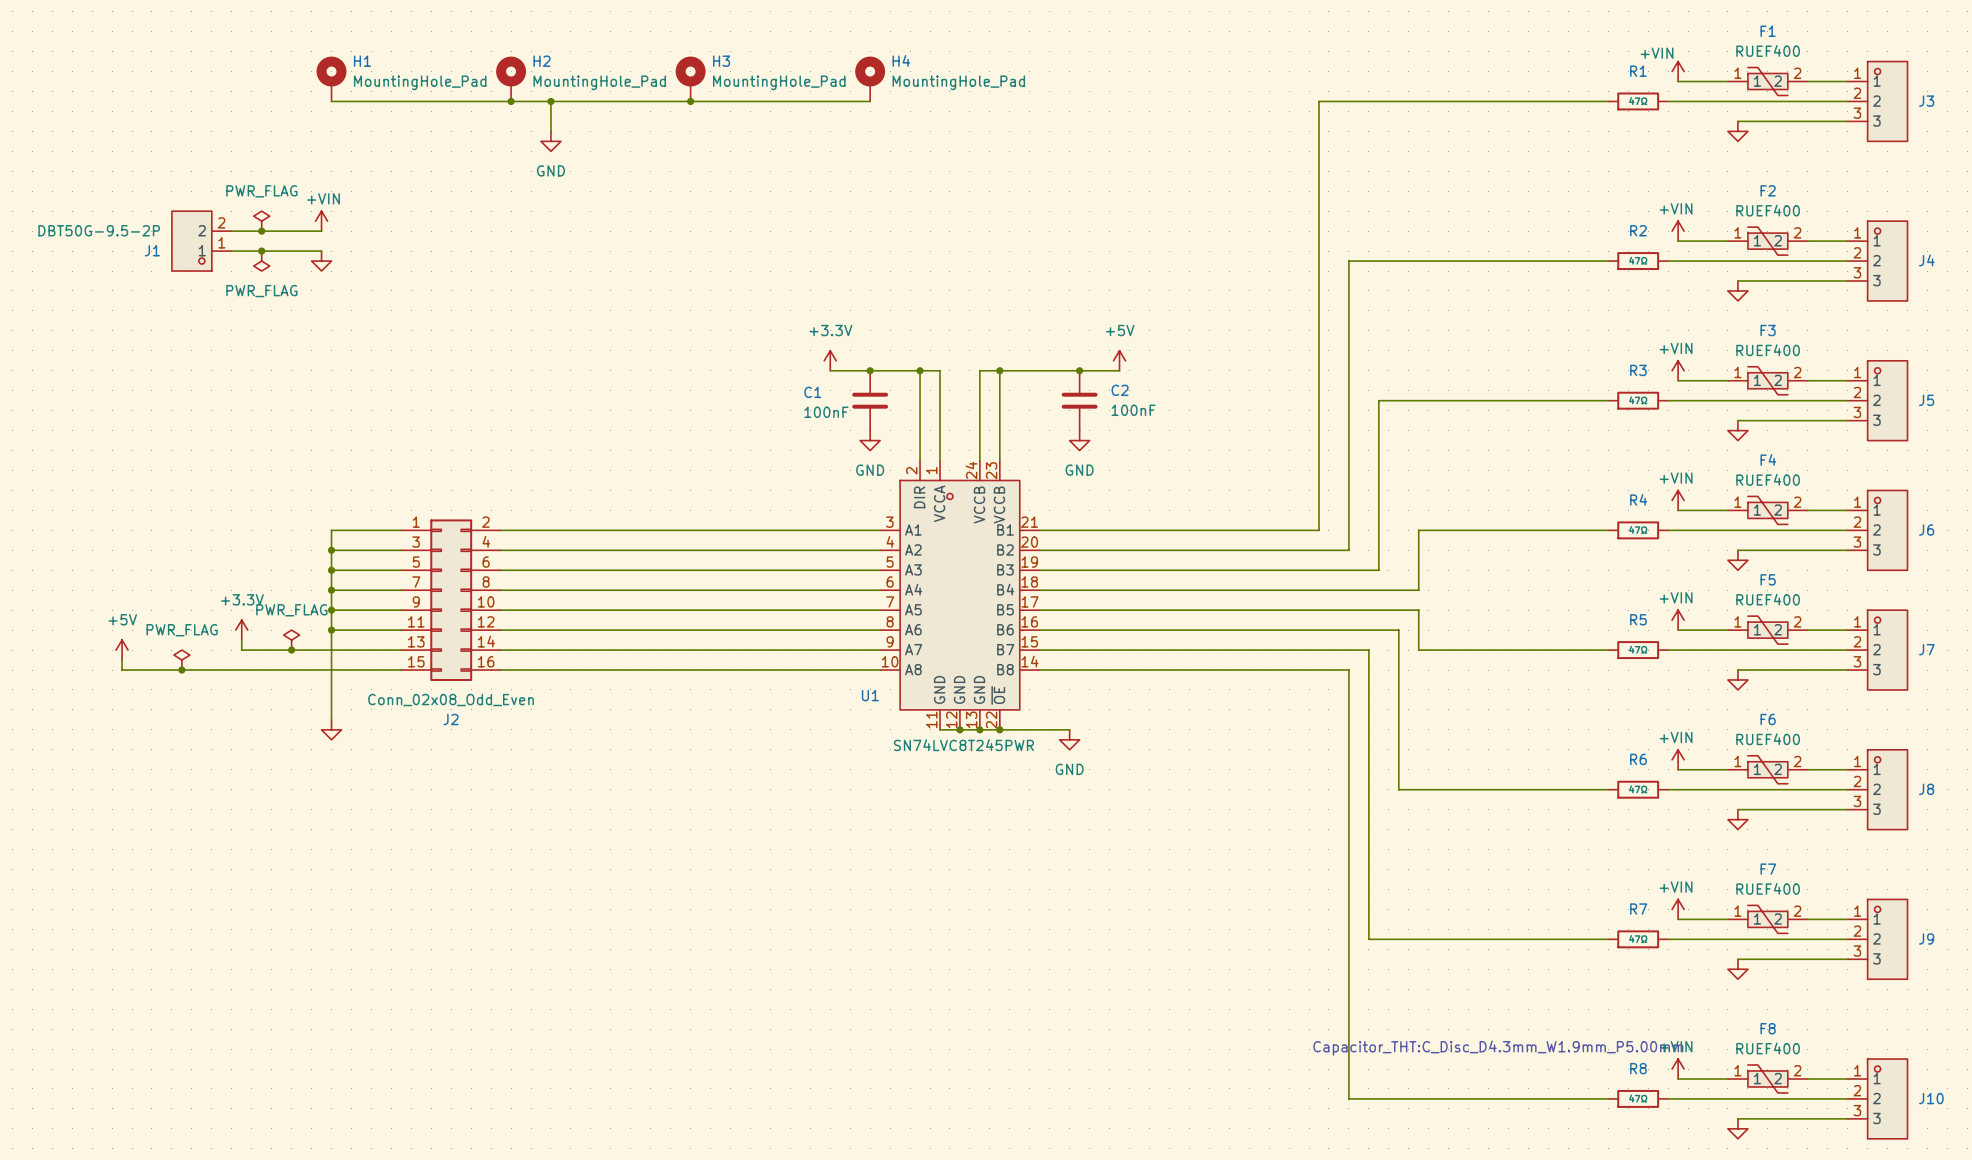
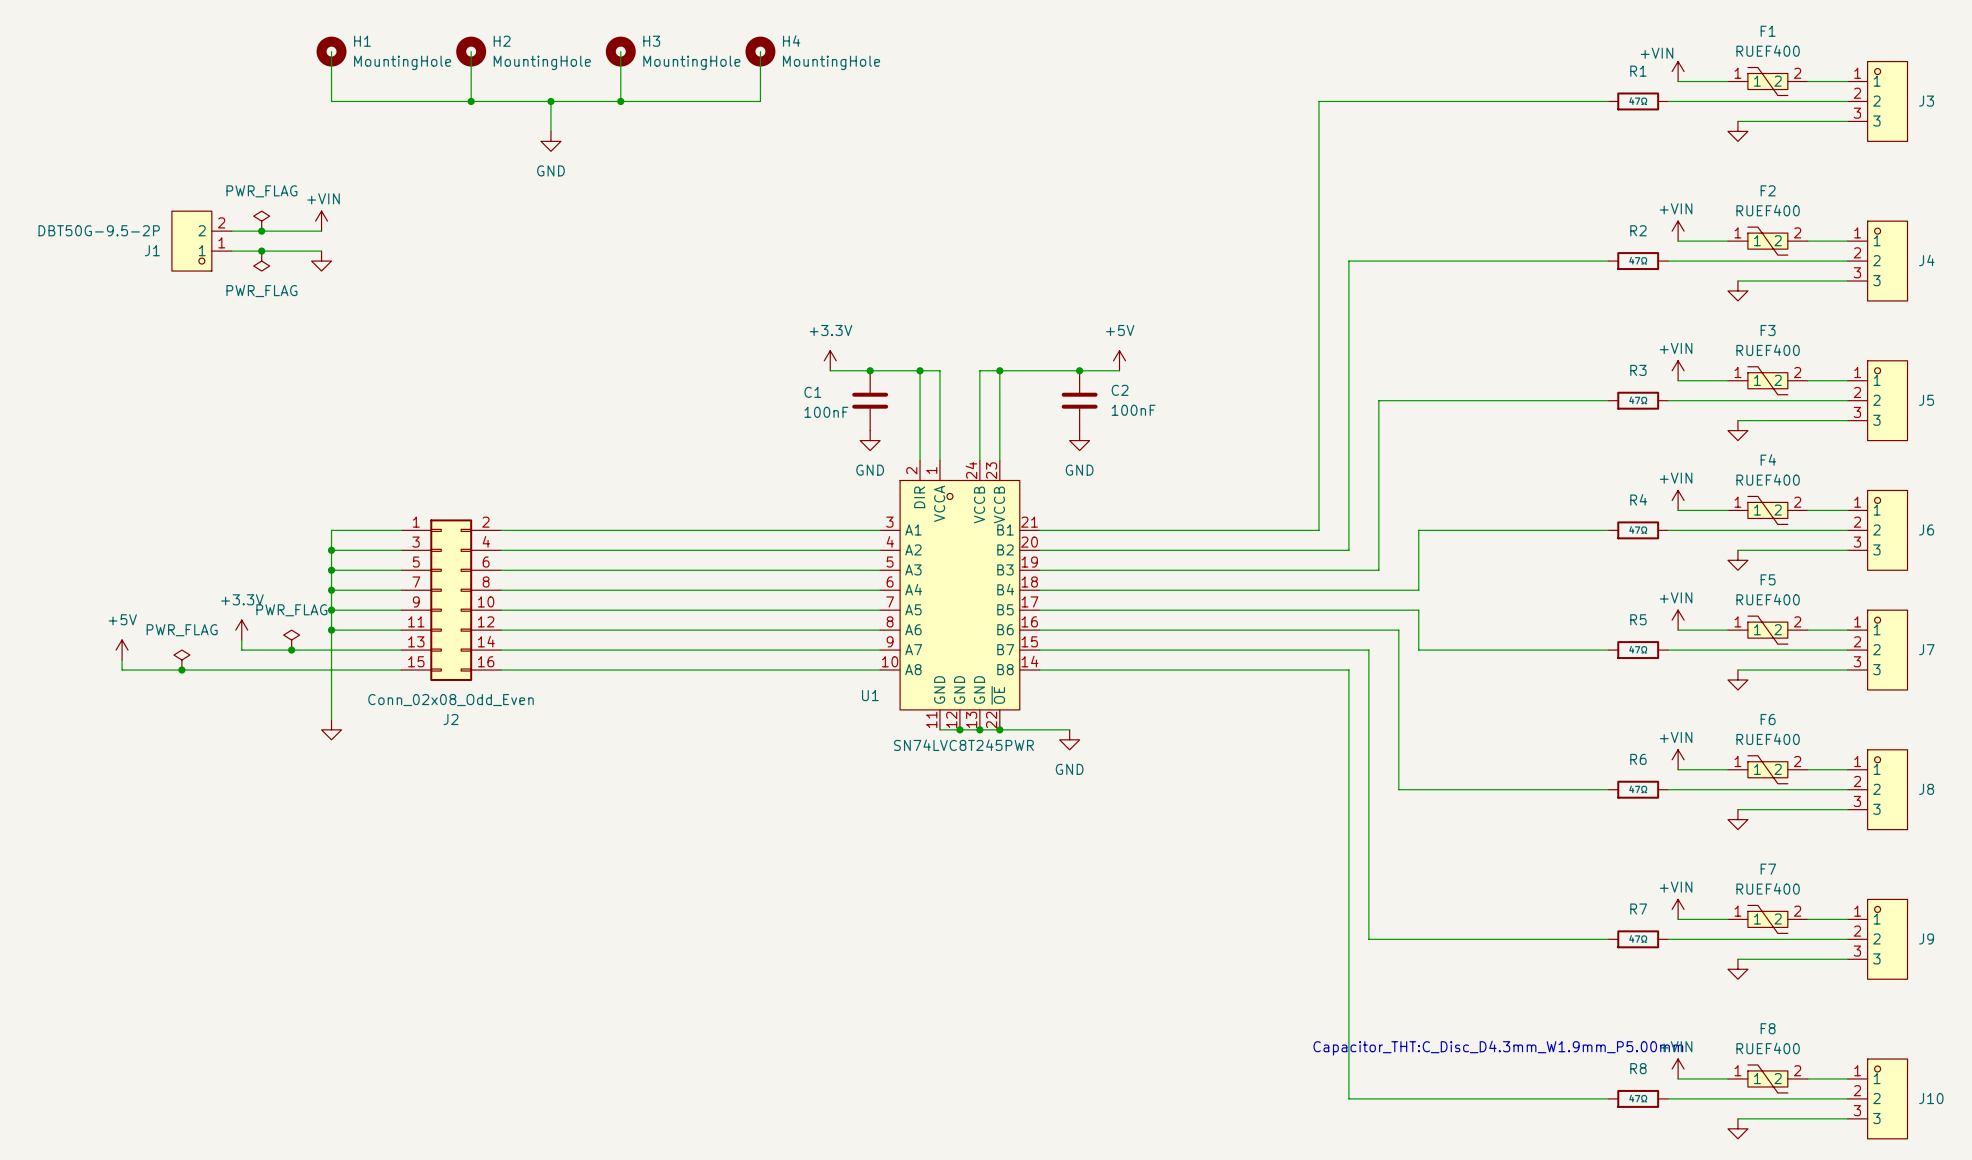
wire: none -> (471, 51) (471, 101)
wire: none -> (620, 51) (620, 101)
H1 symbol: [316, 56, 347, 102] -> [316, 36, 347, 67]
H2 symbol: [496, 56, 527, 102] -> [456, 36, 487, 67]
H3 symbol: [675, 56, 706, 102] -> [605, 36, 636, 67]
H4 symbol: [855, 56, 886, 102] -> [745, 36, 776, 67]
H1 value: MountingHole_Pad (420, 82) -> MountingHole (402, 62)
H2 value: MountingHole_Pad (599, 82) -> MountingHole (542, 62)
H3 value: MountingHole_Pad (779, 82) -> MountingHole (691, 62)
H4 value: MountingHole_Pad (958, 82) -> MountingHole (831, 62)
junction position: (511, 101) -> (471, 101)
junction: none -> (620, 101)
junction: (690, 101) -> none
wire: (760, 101) (870, 101) -> (760, 101) (760, 51)

